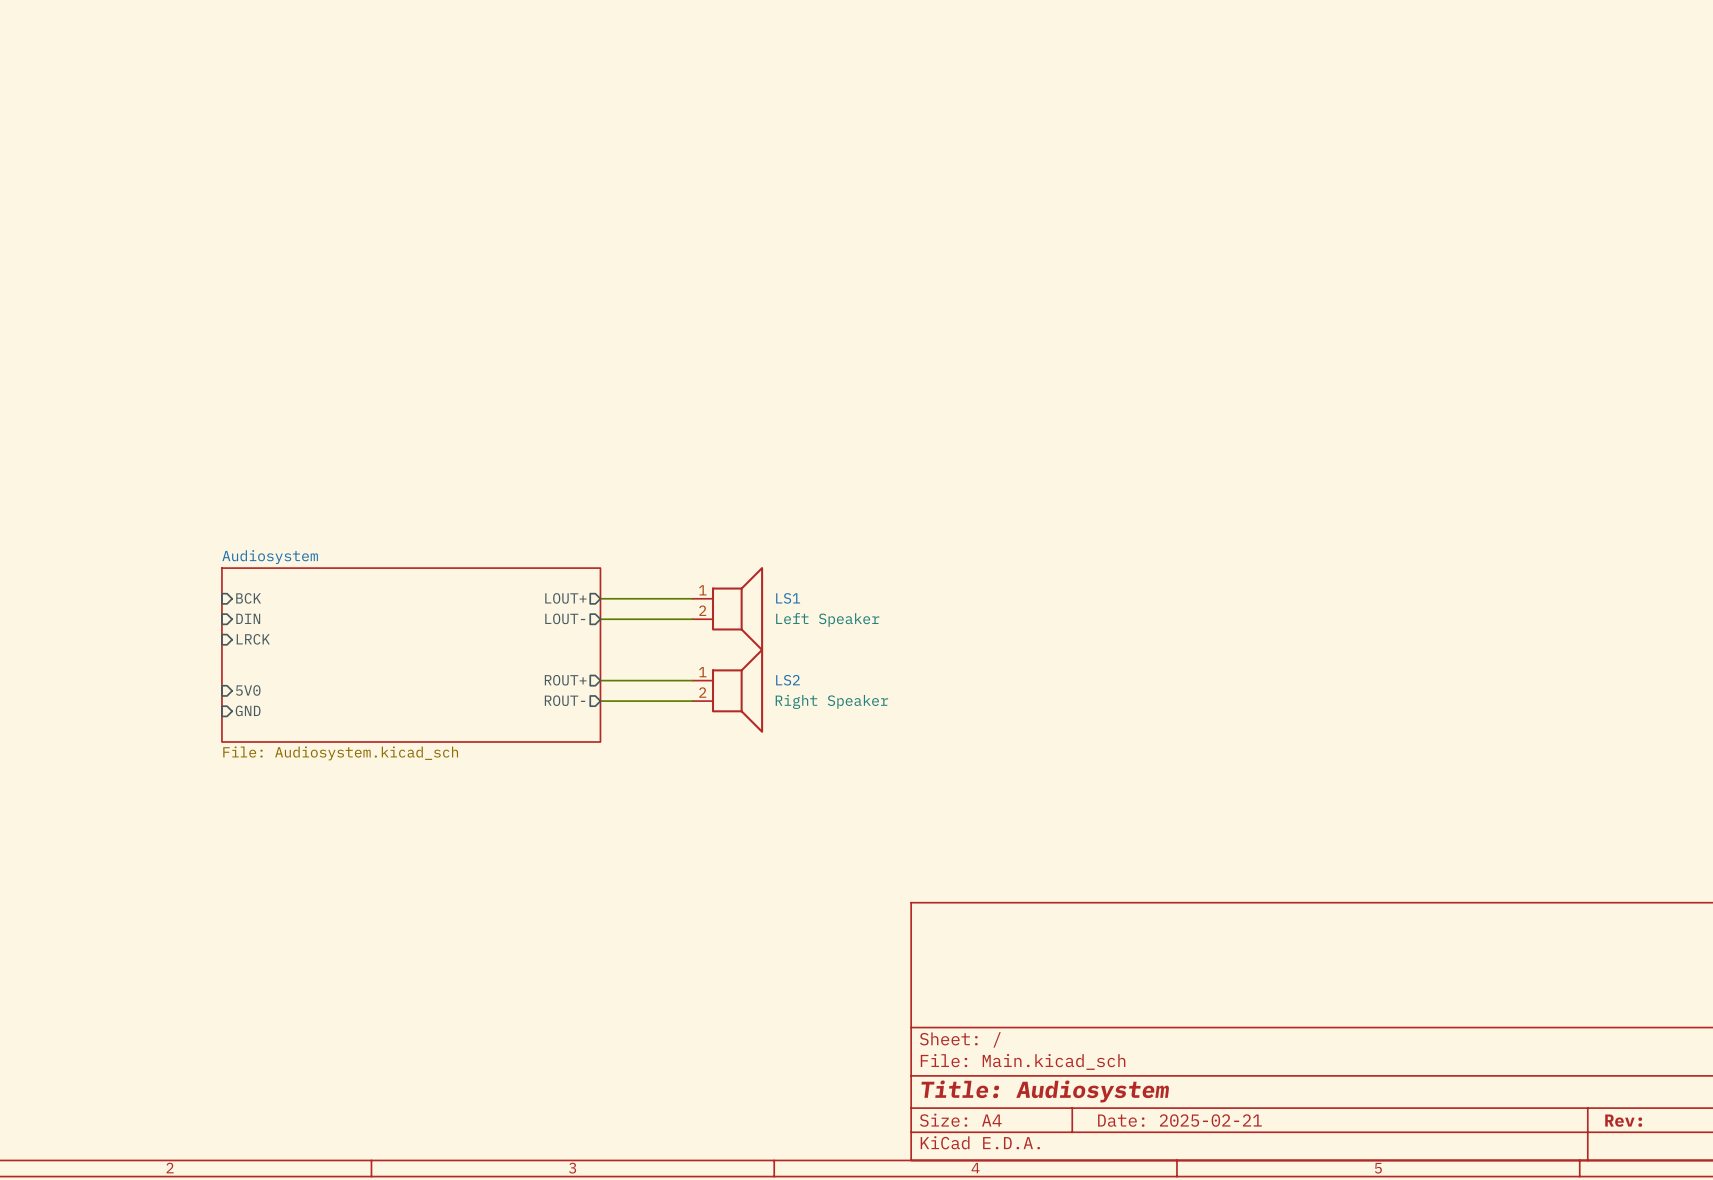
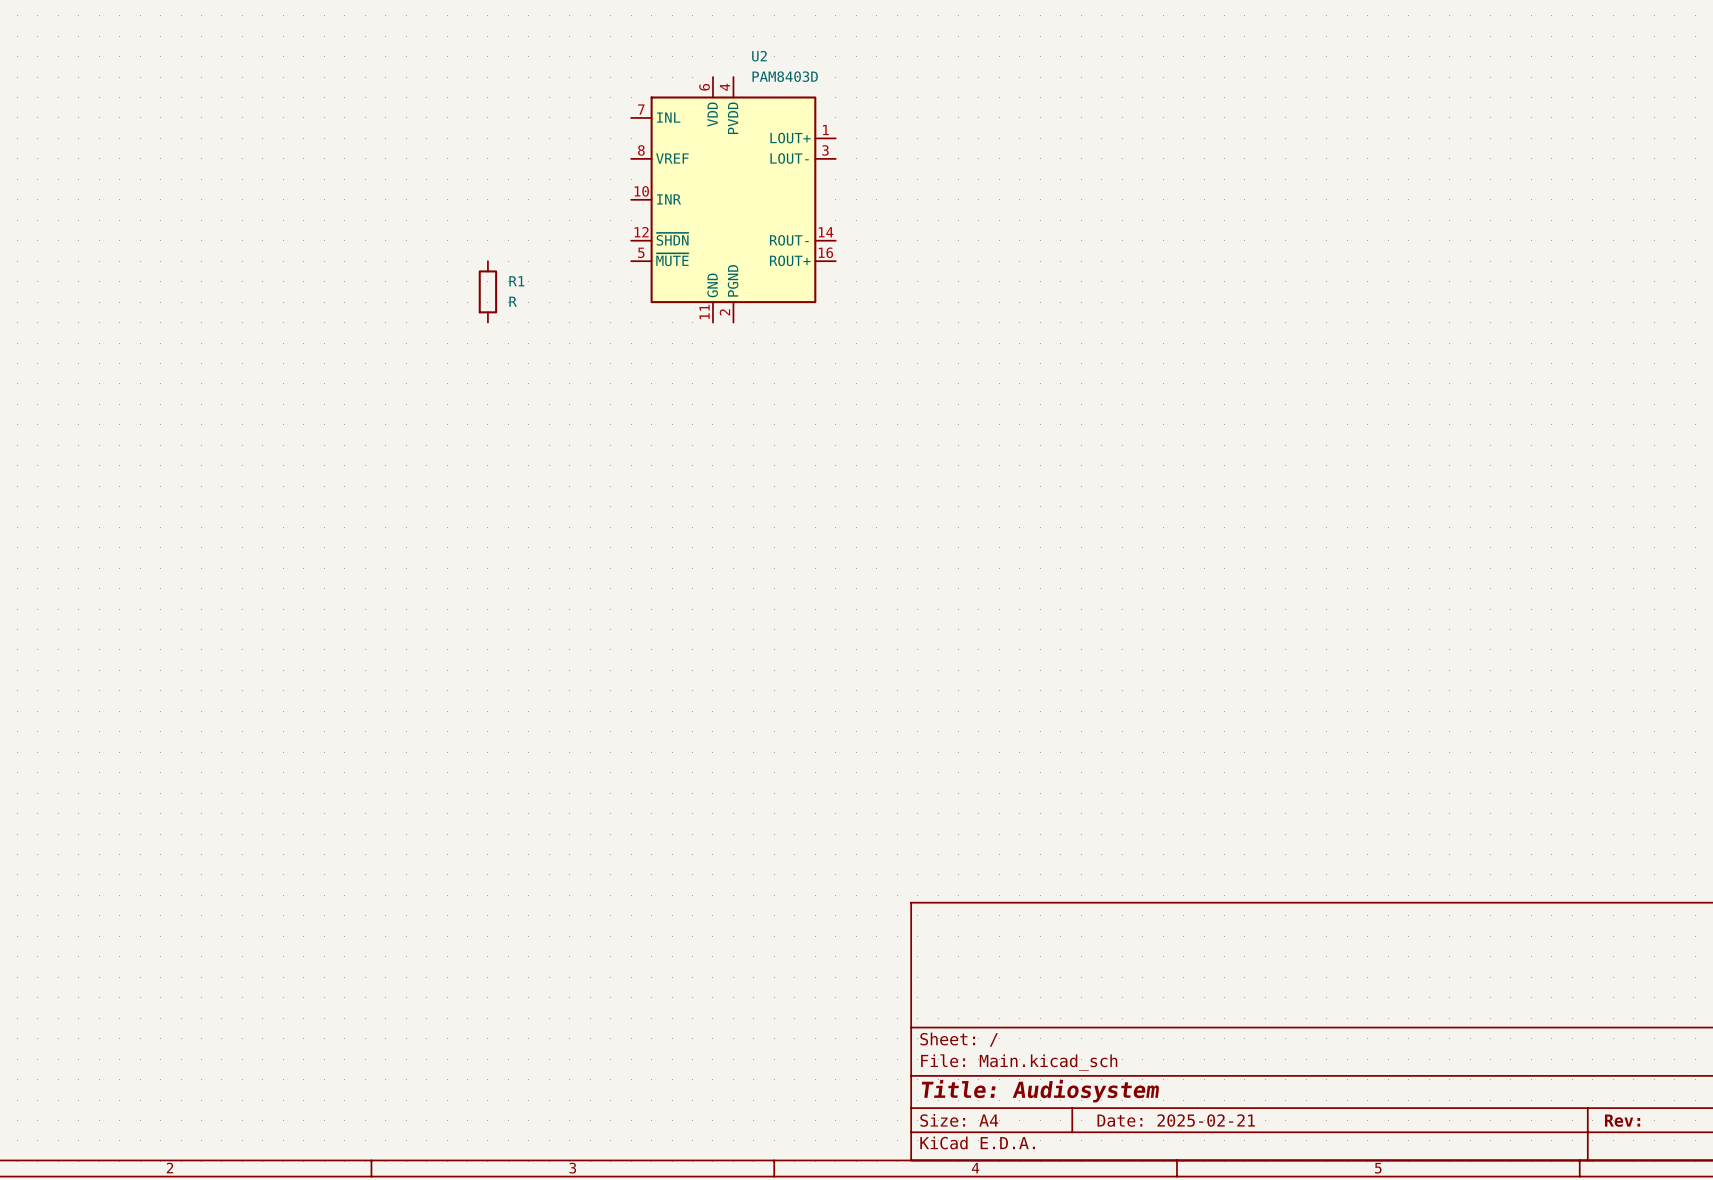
U2: none -> PAM8403D (733, 199)
R1: none -> R (487, 291)
sheet pin: BCK (248, 598) -> none
sheet pin: LOUT+ (565, 598) -> none
wire: (600, 598) (692, 598) -> none
LS1: Left Speaker (727, 609) -> none
sheet pin: DIN (248, 618) -> none
sheet pin: LOUT- (565, 618) -> none
wire: (600, 619) (692, 619) -> none
sheet pin: LRCK (253, 639) -> none
sheet Audiosystem: File: Audiosystem.kicad_sch (411, 655) -> none
sheet pin: ROUT+ (565, 680) -> none
wire: (600, 680) (692, 680) -> none
sheet pin: 5V0 (248, 690) -> none
LS2: Right Speaker (727, 690) -> none
sheet pin: ROUT- (565, 700) -> none
wire: (600, 701) (692, 701) -> none
sheet pin: GND (248, 710) -> none

